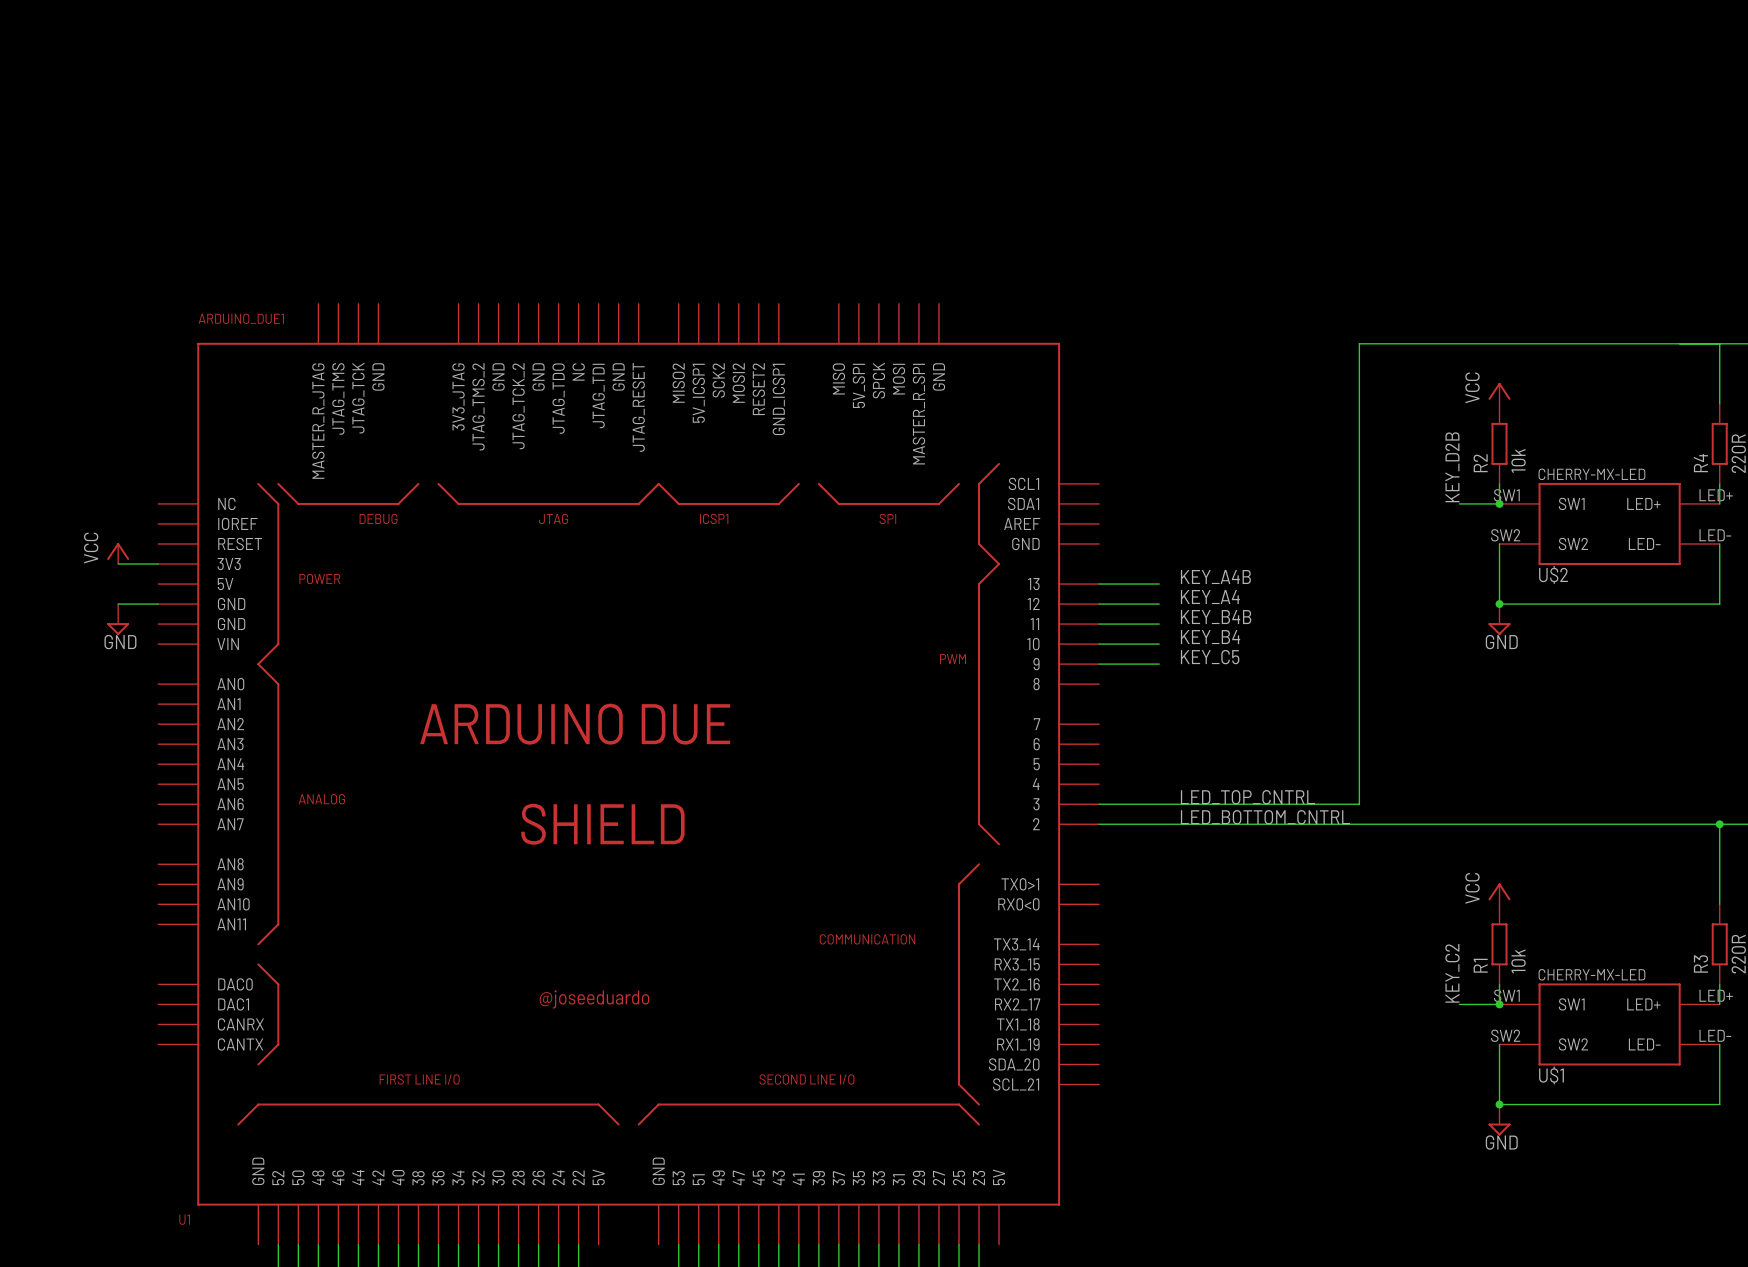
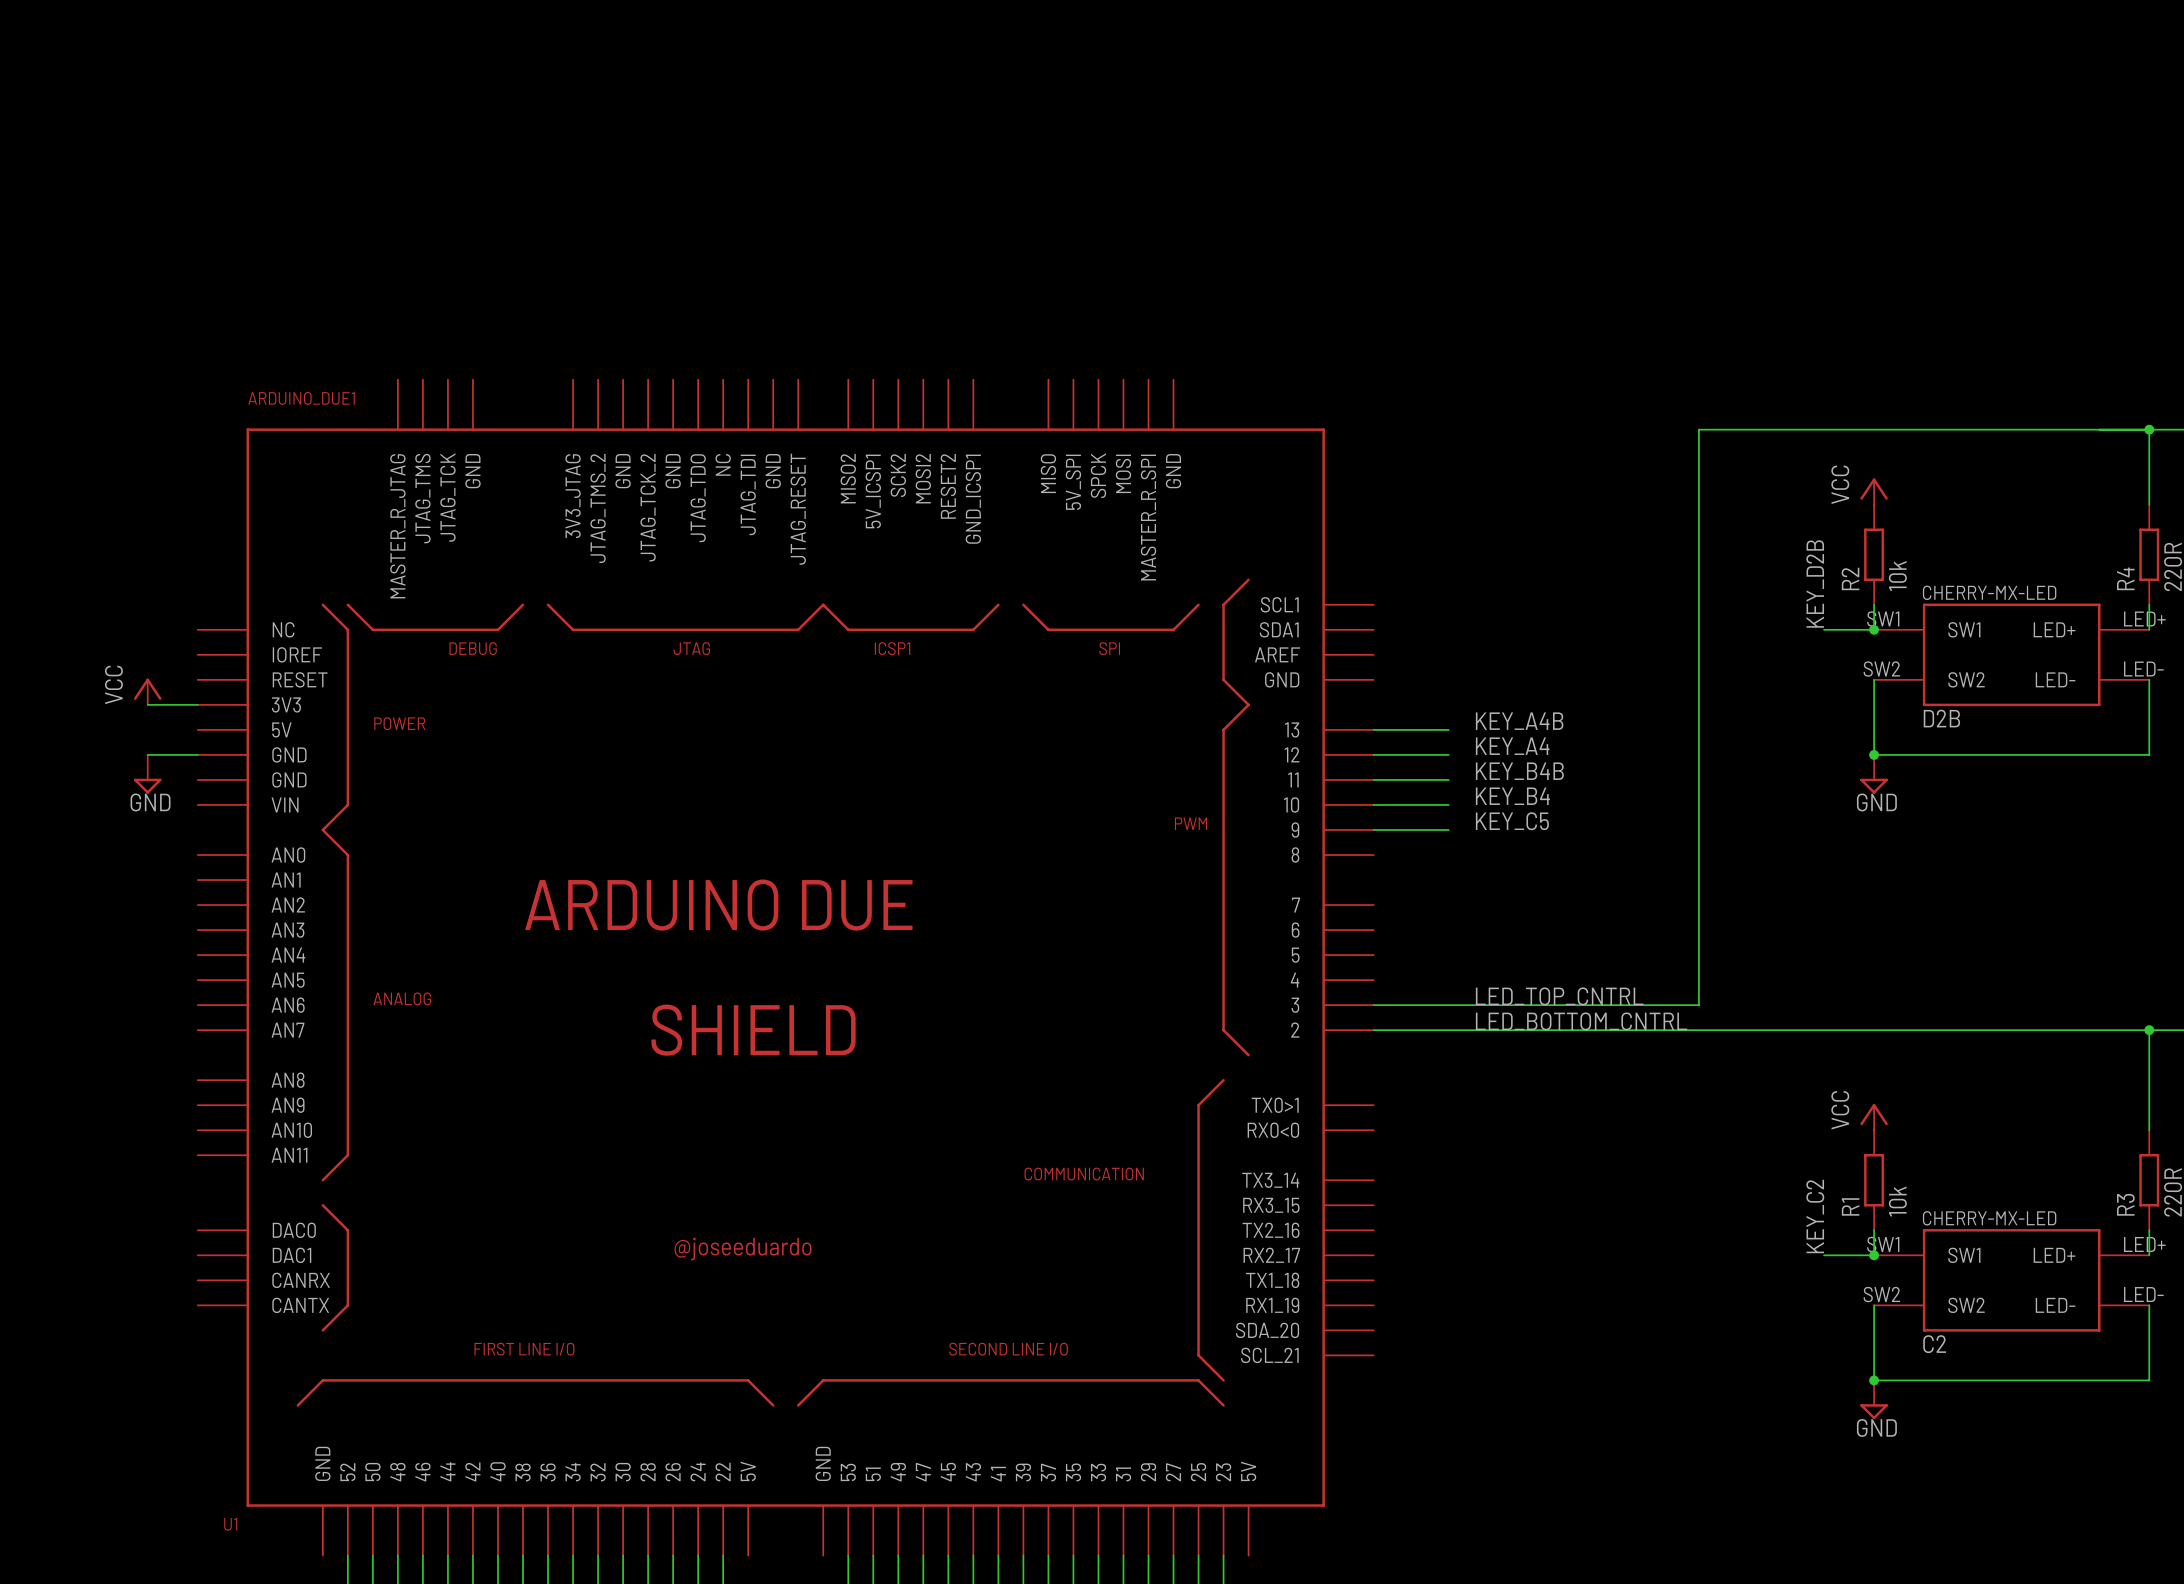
junction: none -> (2149, 429)
U$2 name: U$2 (1553, 574) -> D2B (1941, 718)
U$1 name: U$1 (1551, 1075) -> C2 (1934, 1344)

